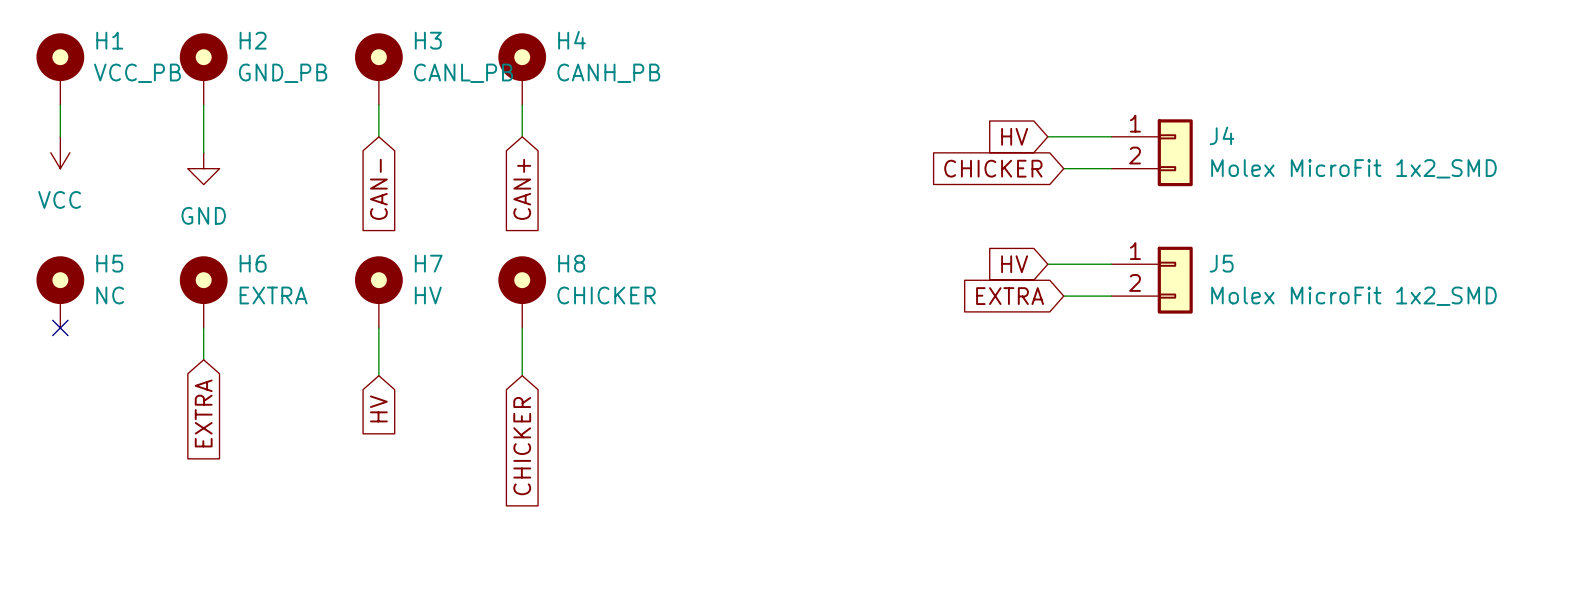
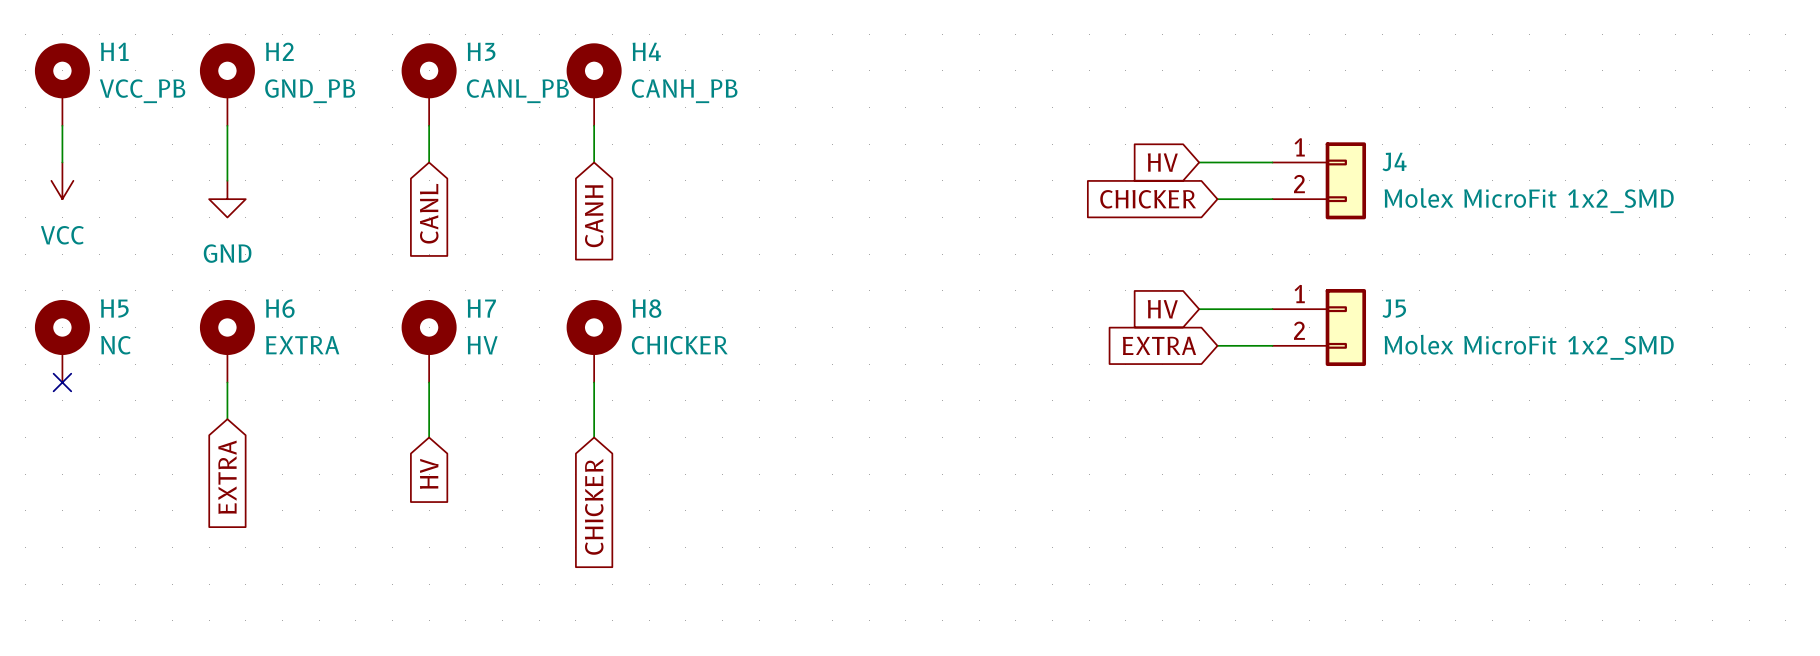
H1 symbol: [36, 33, 85, 105] -> [34, 43, 90, 126]
H2 symbol: [179, 33, 228, 105] -> [199, 43, 255, 126]
H3 symbol: [354, 33, 403, 105] -> [401, 43, 457, 126]
H4 symbol: [498, 33, 547, 105] -> [566, 43, 622, 126]
global label: CAN- (378, 189) -> CANL (429, 213)
global label: CAN+ (522, 189) -> CANH (594, 216)
H5 symbol: [36, 256, 85, 328] -> [34, 300, 90, 383]
H6 symbol: [179, 256, 228, 328] -> [199, 300, 255, 383]
H7 symbol: [354, 256, 403, 328] -> [401, 300, 457, 383]
H8 symbol: [498, 256, 547, 328] -> [566, 300, 622, 383]

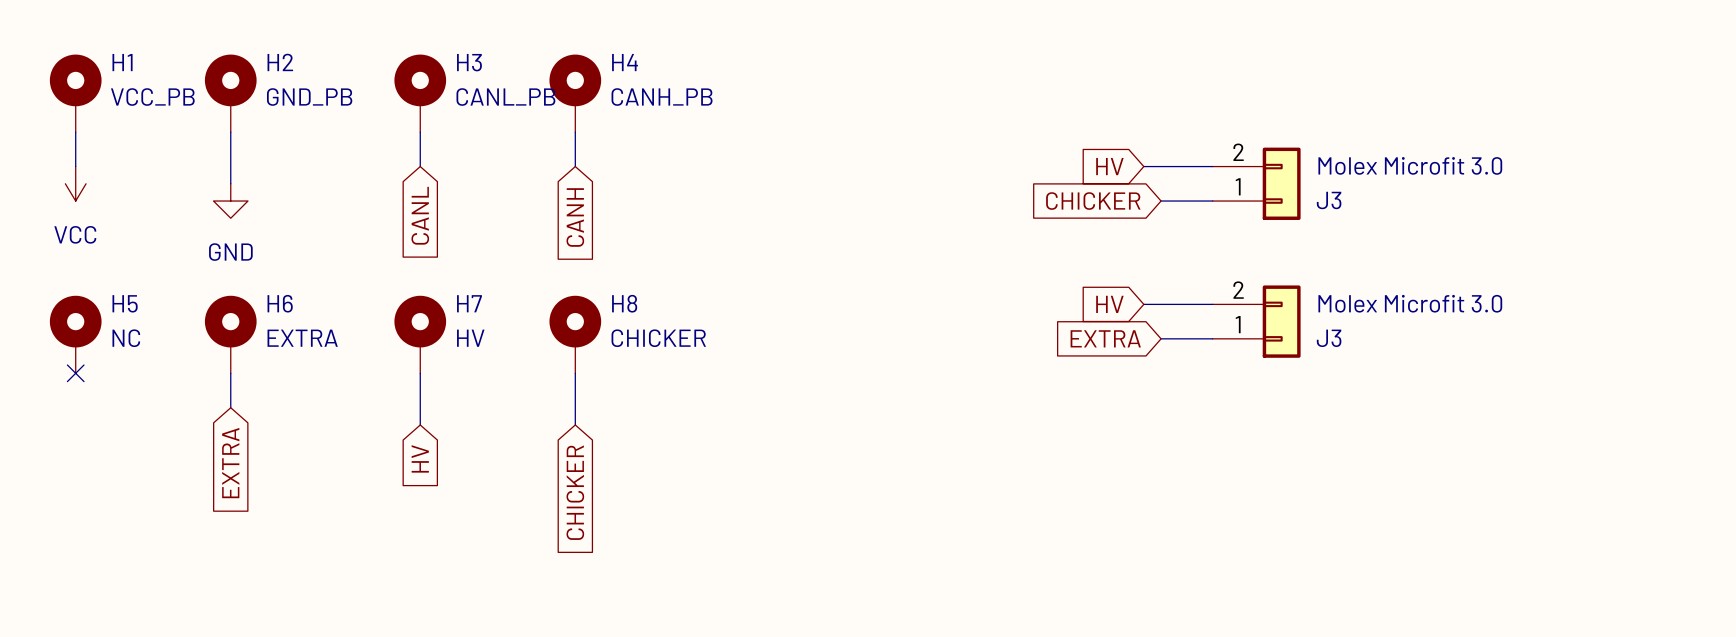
J4 name: J4 (1394, 161) -> J3 (1329, 200)
J4 flip: as is (1345, 180) -> up-down (1281, 183)
J4 value: Molex MicroFit 1x2_SMD (1529, 200) -> Molex Microfit 3.0 (1410, 165)
J5 name: J5 (1394, 308) -> J3 (1329, 338)
J5 flip: as is (1345, 327) -> up-down (1281, 321)
J5 value: Molex MicroFit 1x2_SMD (1529, 347) -> Molex Microfit 3.0 (1410, 303)

